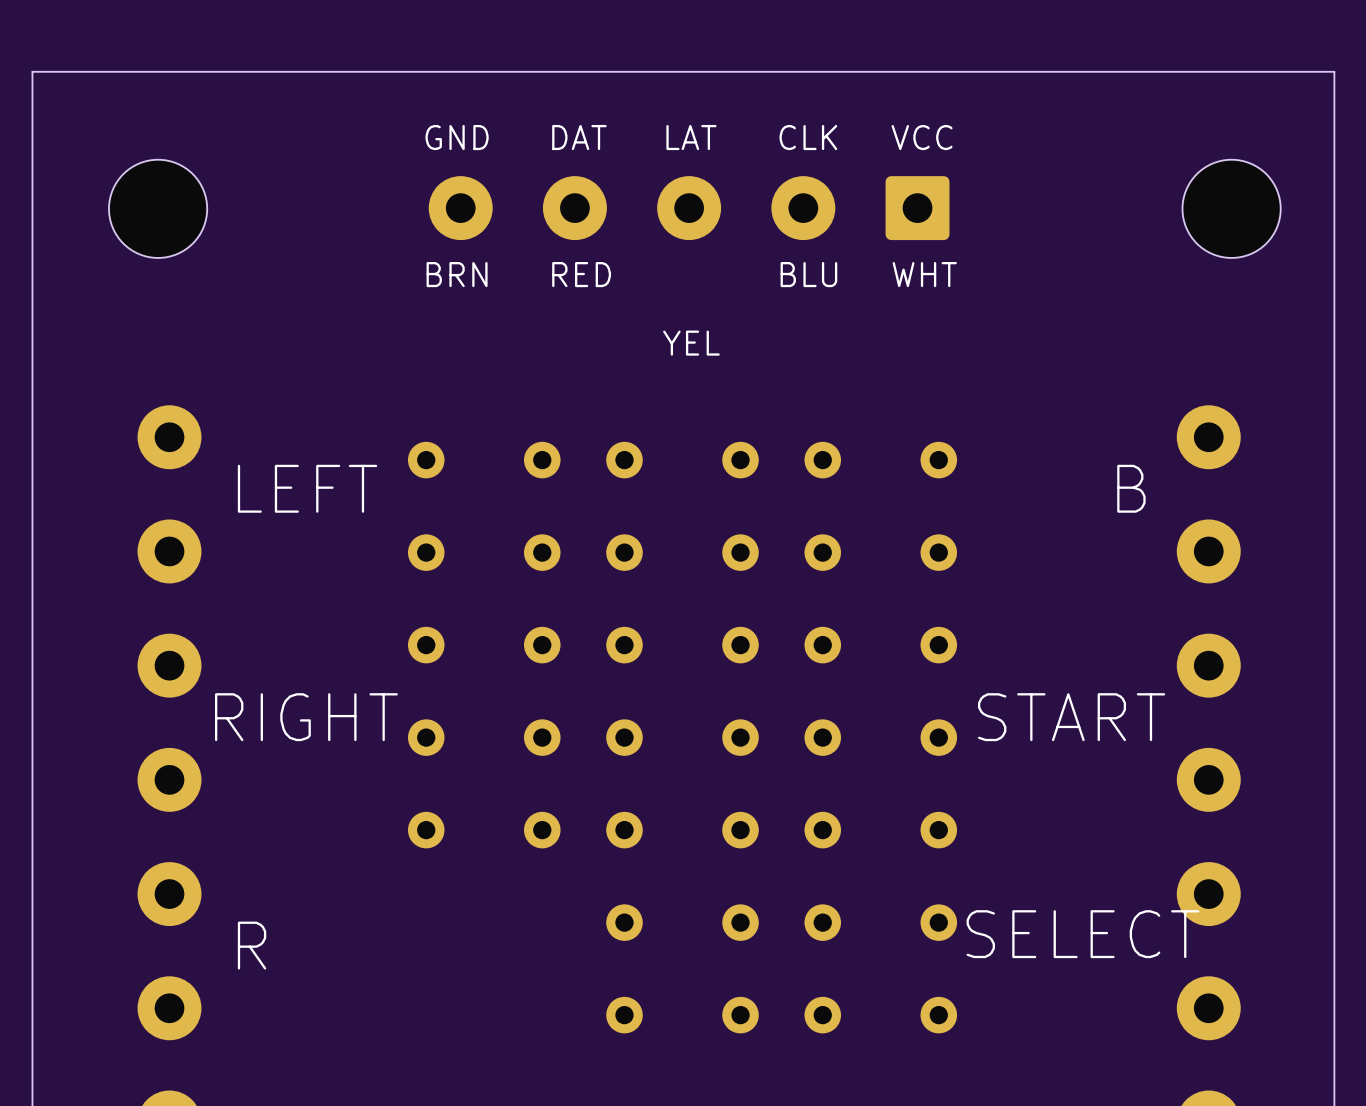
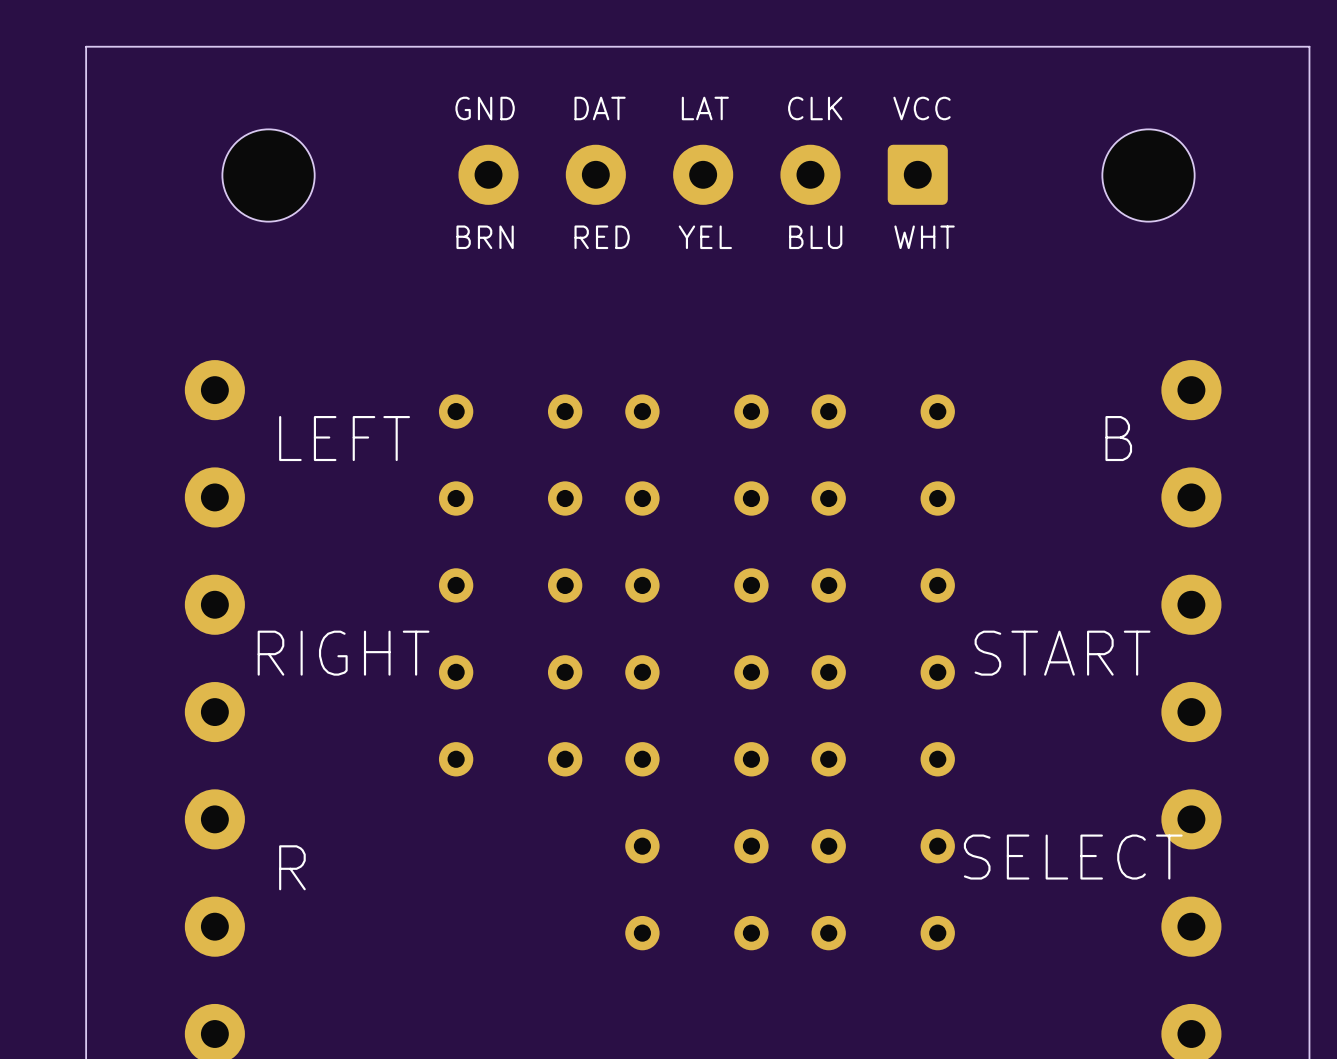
part position: (158, 208) -> (268, 175)
part position: (1231, 208) -> (1148, 175)
text position: YEL (691, 343) -> YEL (705, 237)

